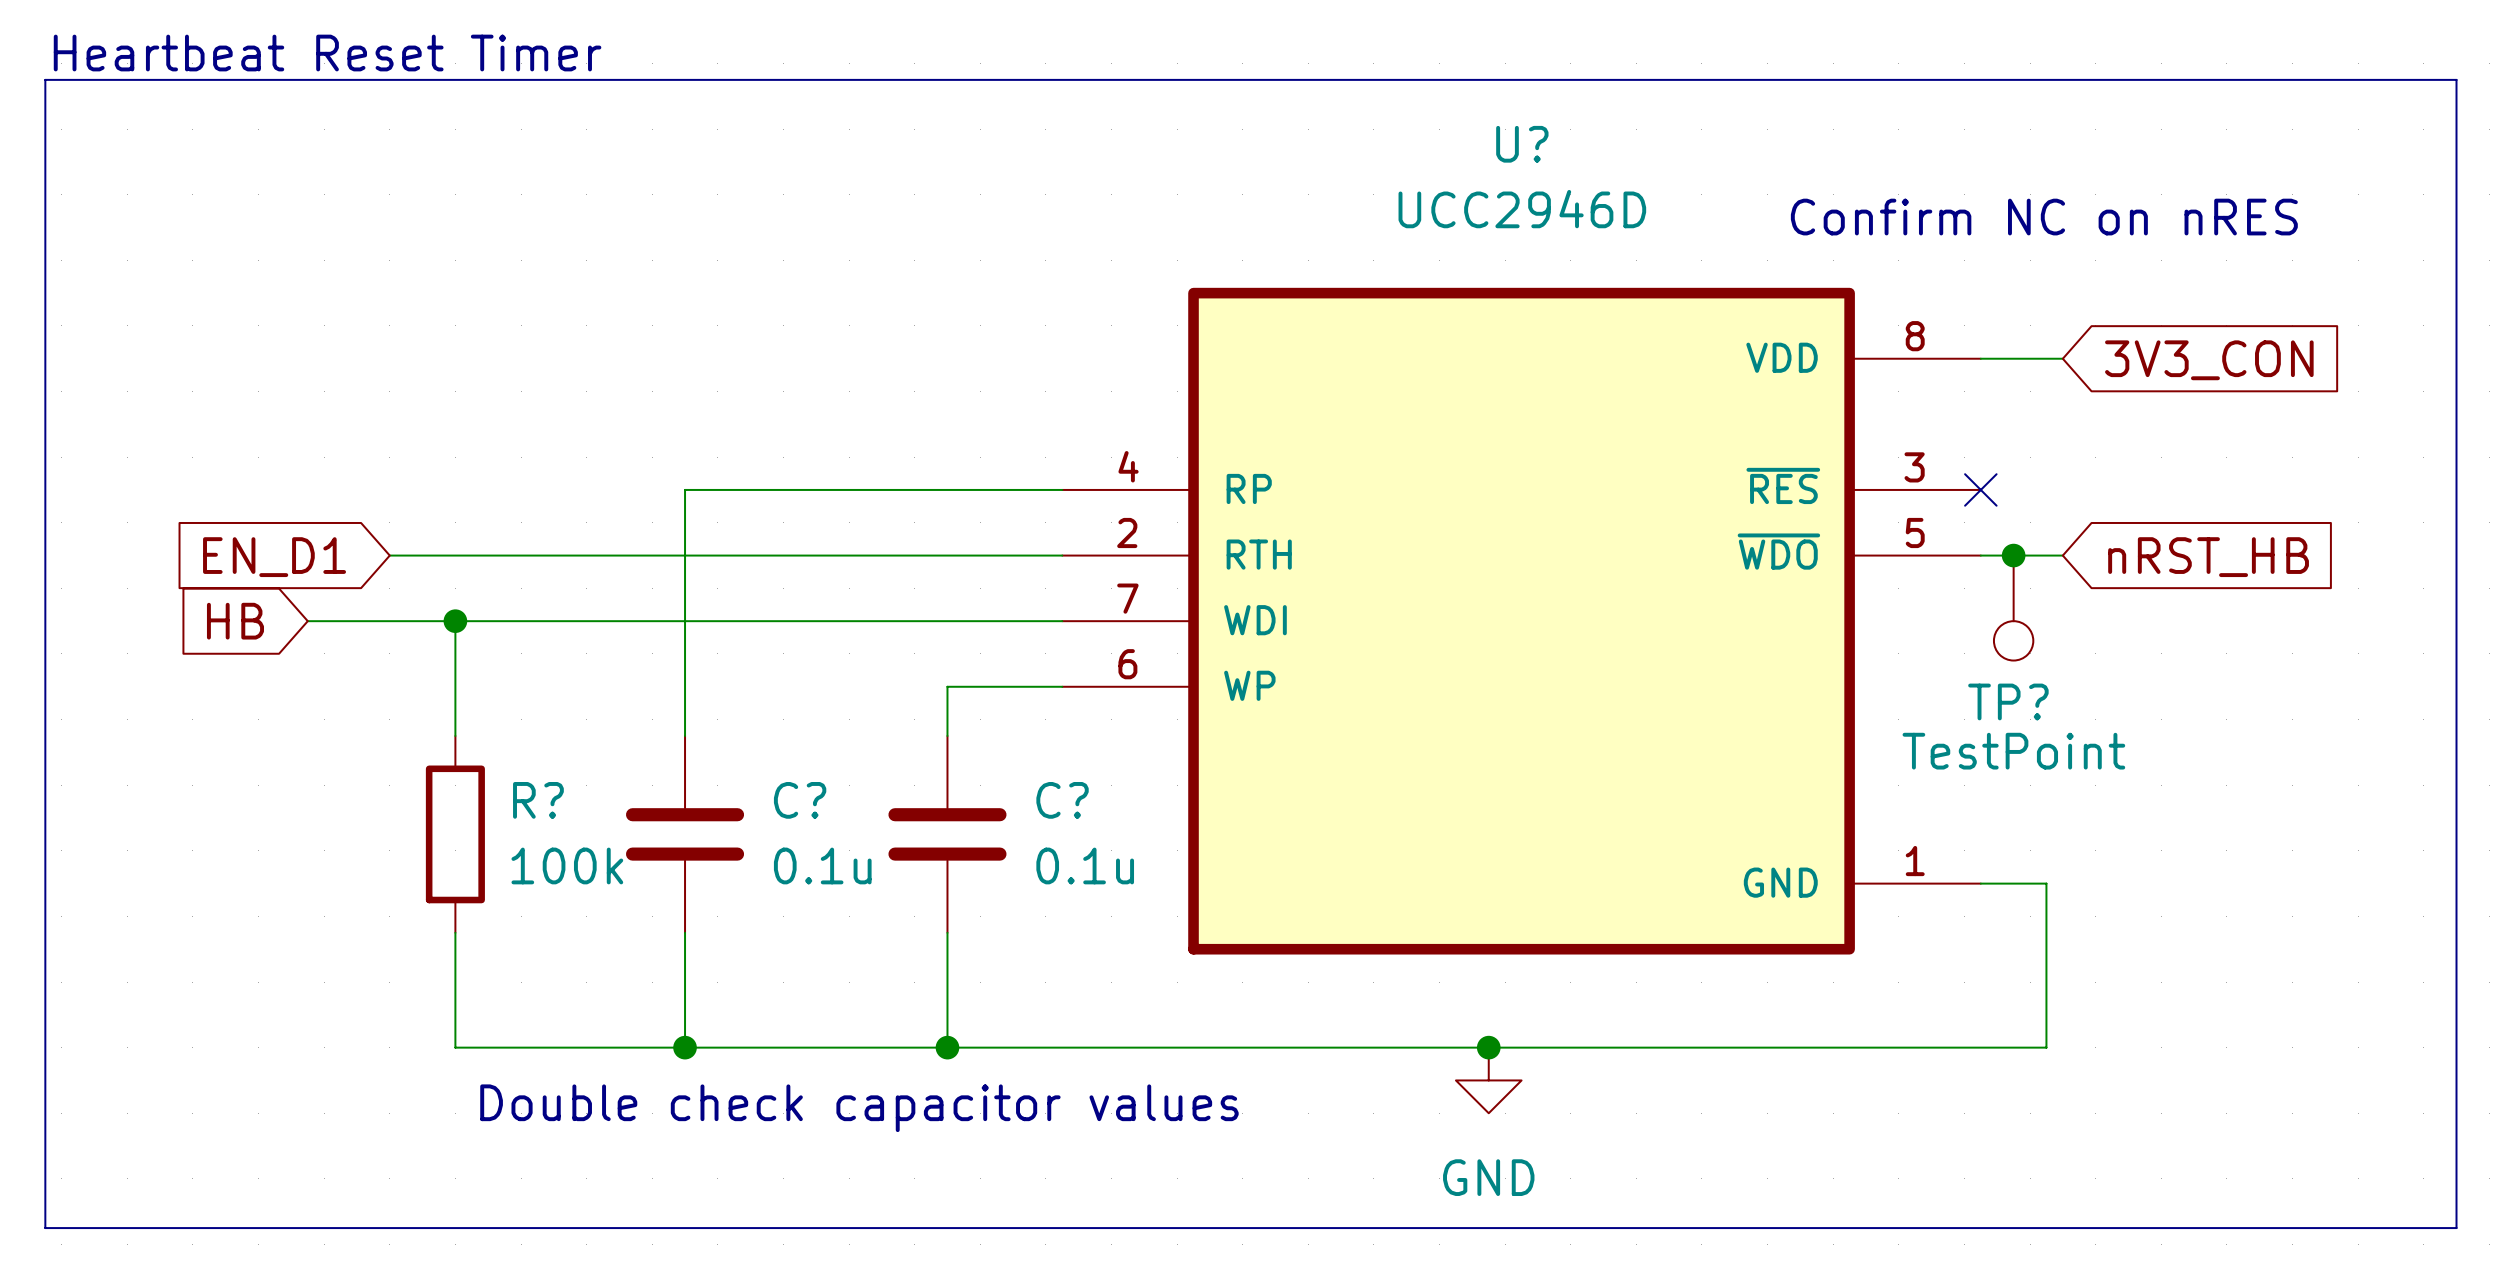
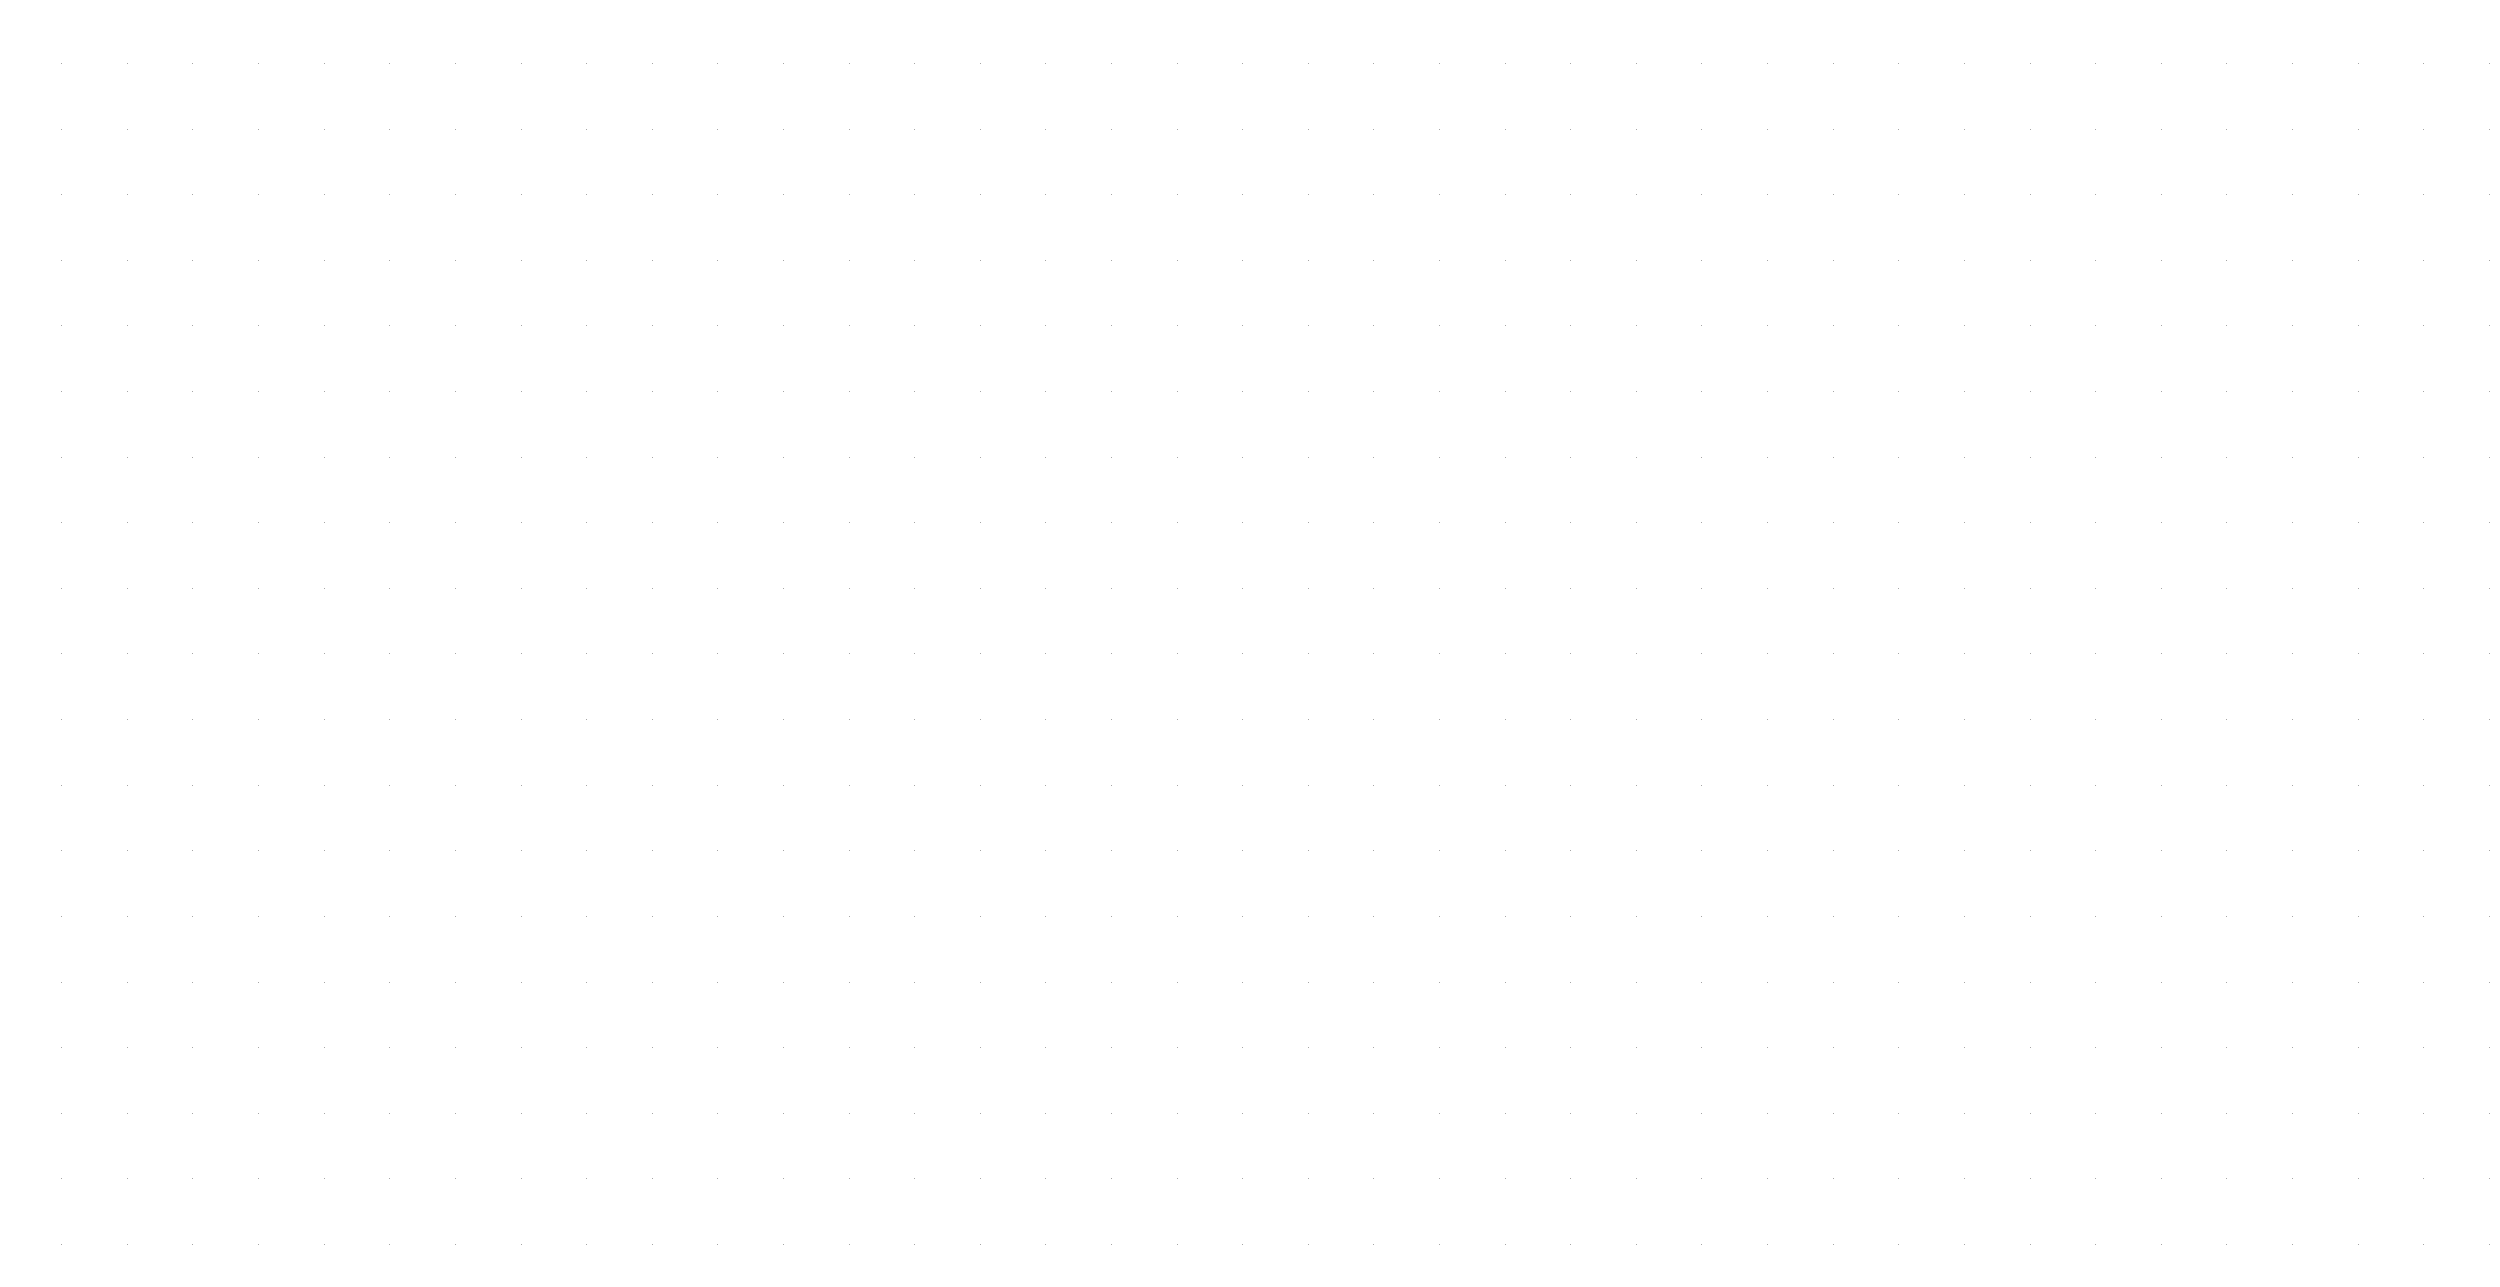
text: Heartbeat Reset Timer (327, 53) -> none
line: (45, 79) (45, 1228) (2456, 1228) (2456, 79) (45, 79) -> none
text: Confirm NC on nRES (2044, 217) -> none
wire: (1980, 358) (2062, 358) -> none
global label: 3V3_CON (2209, 360) -> none
wire: (1062, 489) (685, 489) (685, 735) -> none
no-connect mark: (1980, 489) -> none
wire: (389, 555) (1062, 555) -> none
wire: (1980, 555) (2062, 555) -> none
junction: (2013, 555) -> none
global label: EN_D1 (274, 557) -> none
global label: nRST_HB (2208, 557) -> none
TP?: TestPoint (2013, 608) -> none
global label: HB (235, 621) -> none
wire: (307, 621) (1062, 621) -> none
wire: (455, 621) (455, 735) -> none
junction: (455, 621) -> none
U?: UCC2946D (1521, 621) -> none
wire: (1062, 686) (947, 686) (947, 735) -> none
R?: 100k (455, 834) -> none
C?: 0.1u (685, 834) -> none
C?: 0.1u (947, 834) -> none
wire: (1980, 883) (2046, 883) (2046, 1047) (455, 1047) (455, 932) -> none
wire: (685, 932) (685, 1047) -> none
wire: (947, 932) (947, 1047) -> none
junction: (685, 1047) -> none
junction: (947, 1047) -> none
junction: (1488, 1047) -> none
power symbol: GND (1488, 1080) -> none
text: Double check capacitor values (859, 1108) -> none

